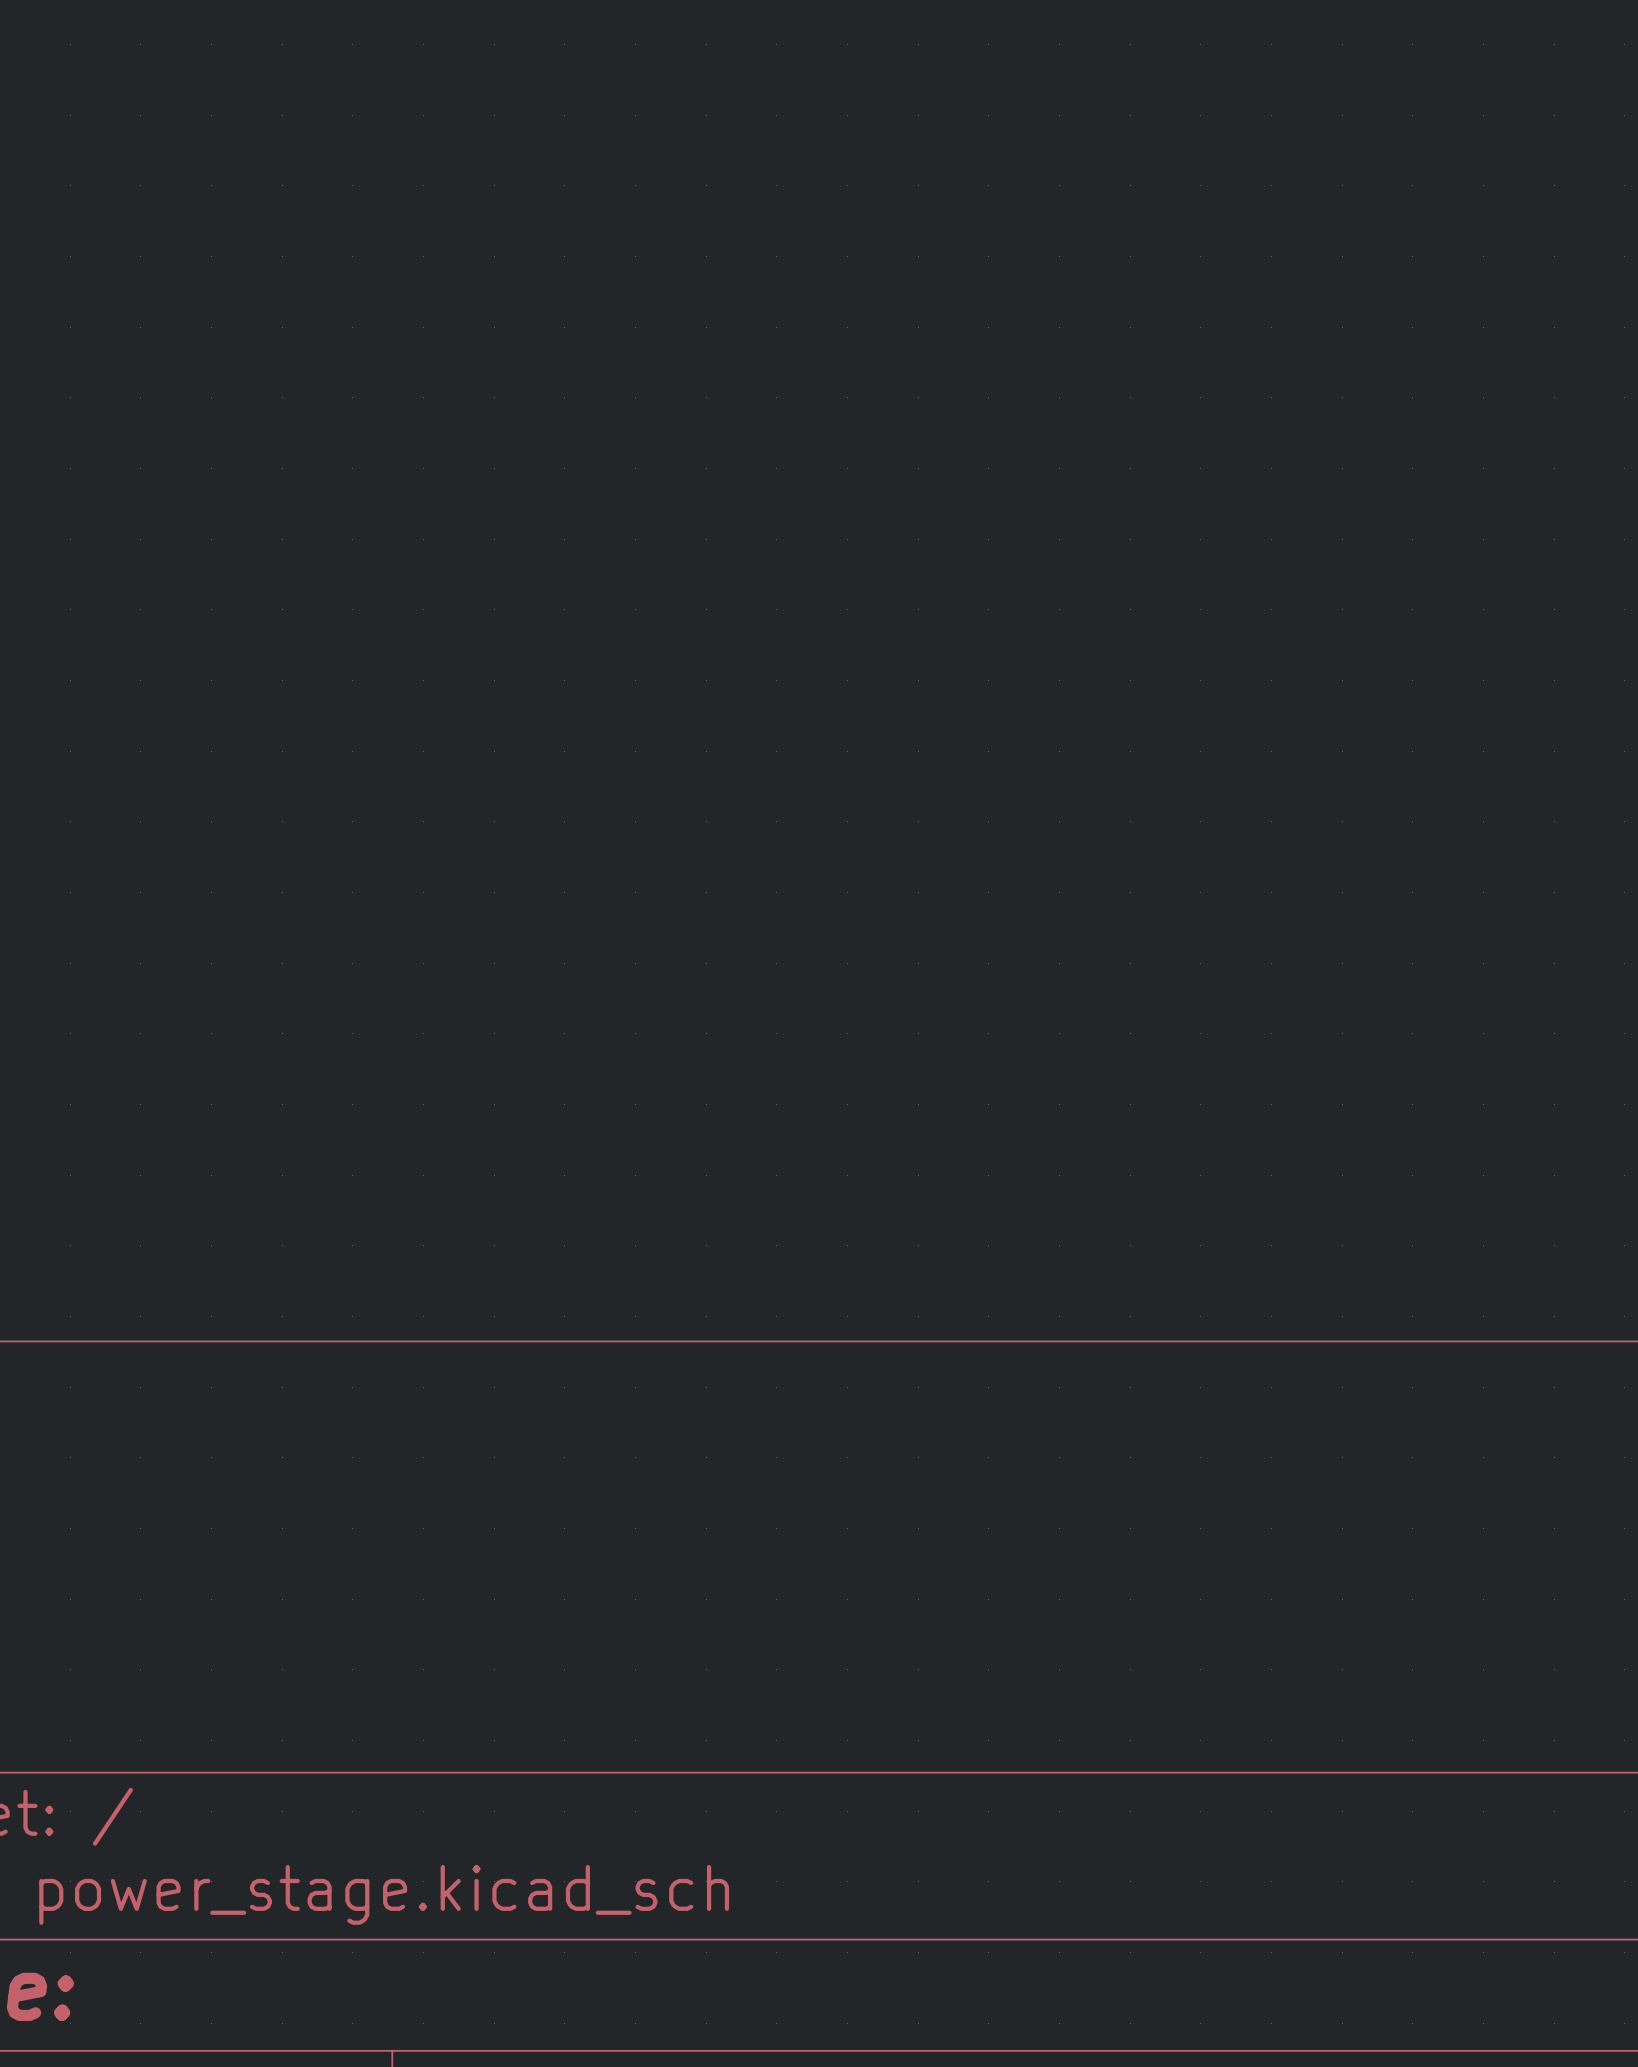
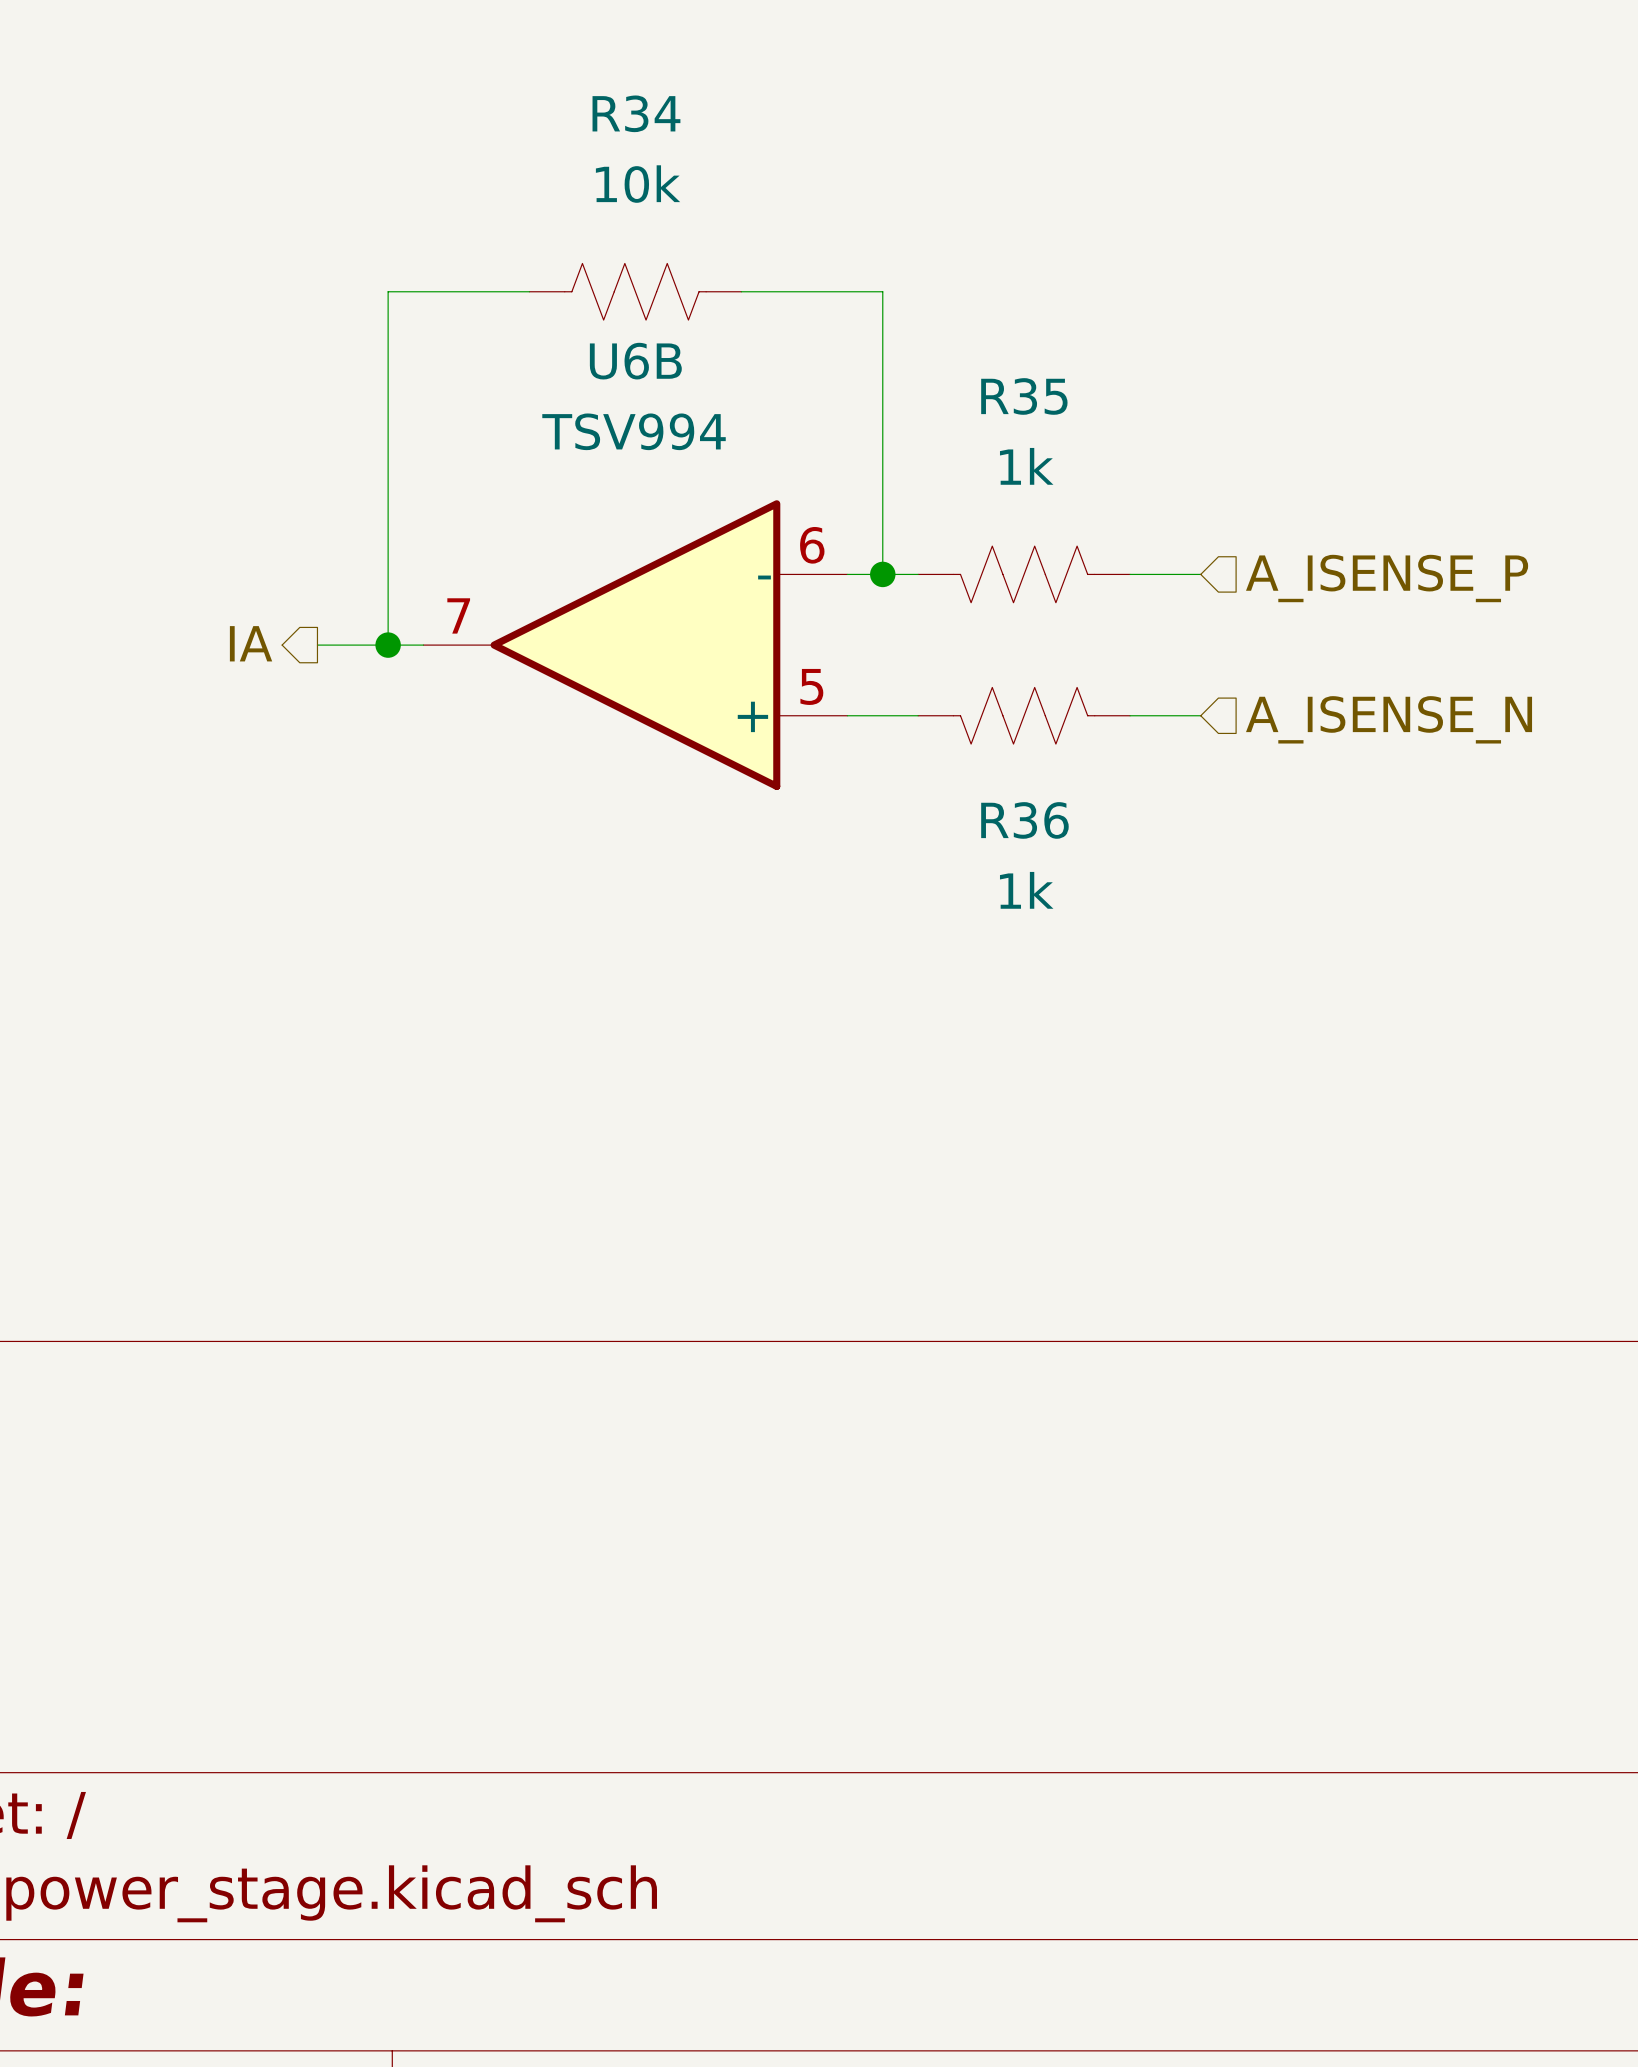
wire: none -> (529, 291) (388, 291) (388, 645)
R34: none -> 10k (635, 291)
wire: none -> (741, 291) (882, 291) (882, 574)
wire: none -> (847, 574) (918, 574)
junction: none -> (882, 574)
R35: none -> 1k (1024, 574)
wire: none -> (1130, 574) (1200, 574)
hierarchical label: none -> A_ISENSE_P (1387, 578)
hierarchical label: none -> IA (251, 643)
wire: none -> (317, 645) (423, 645)
junction: none -> (388, 645)
U6B: none -> TSV994 (635, 645)
wire: none -> (847, 715) (918, 715)
R36: none -> 1k (1024, 715)
wire: none -> (1130, 715) (1200, 715)
hierarchical label: none -> A_ISENSE_N (1389, 719)

